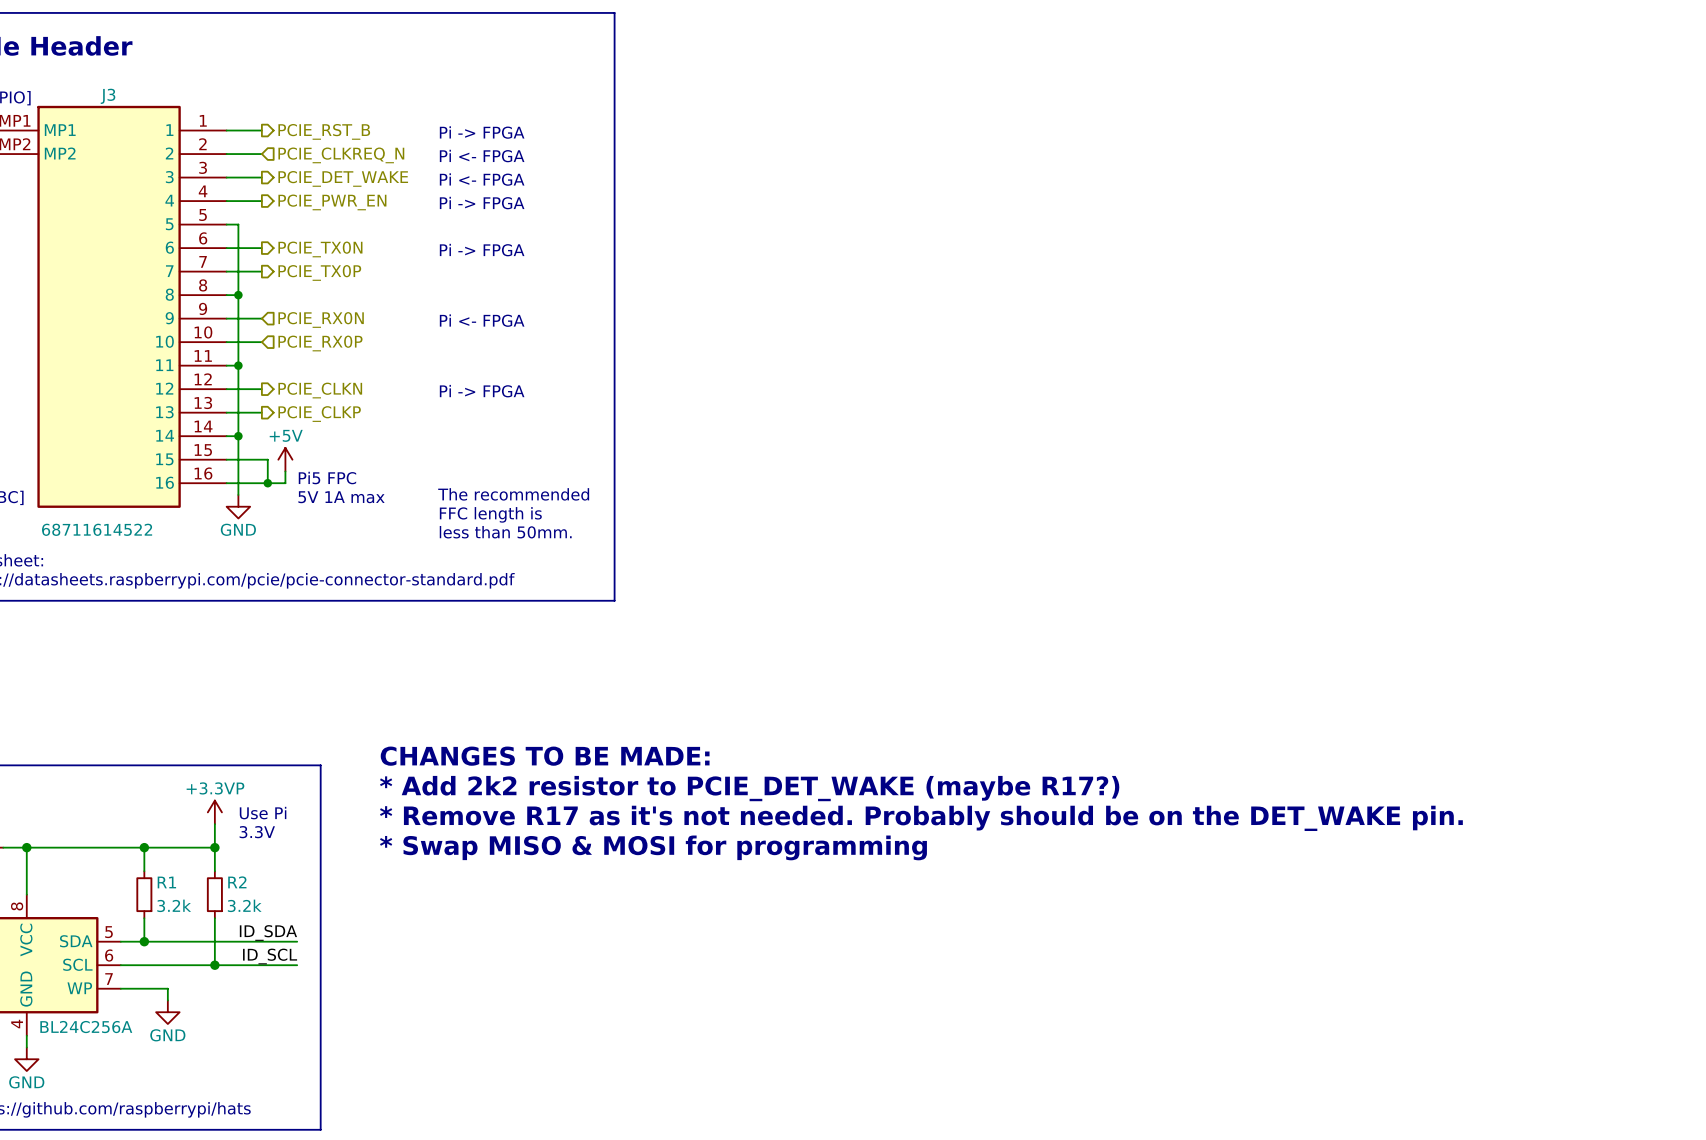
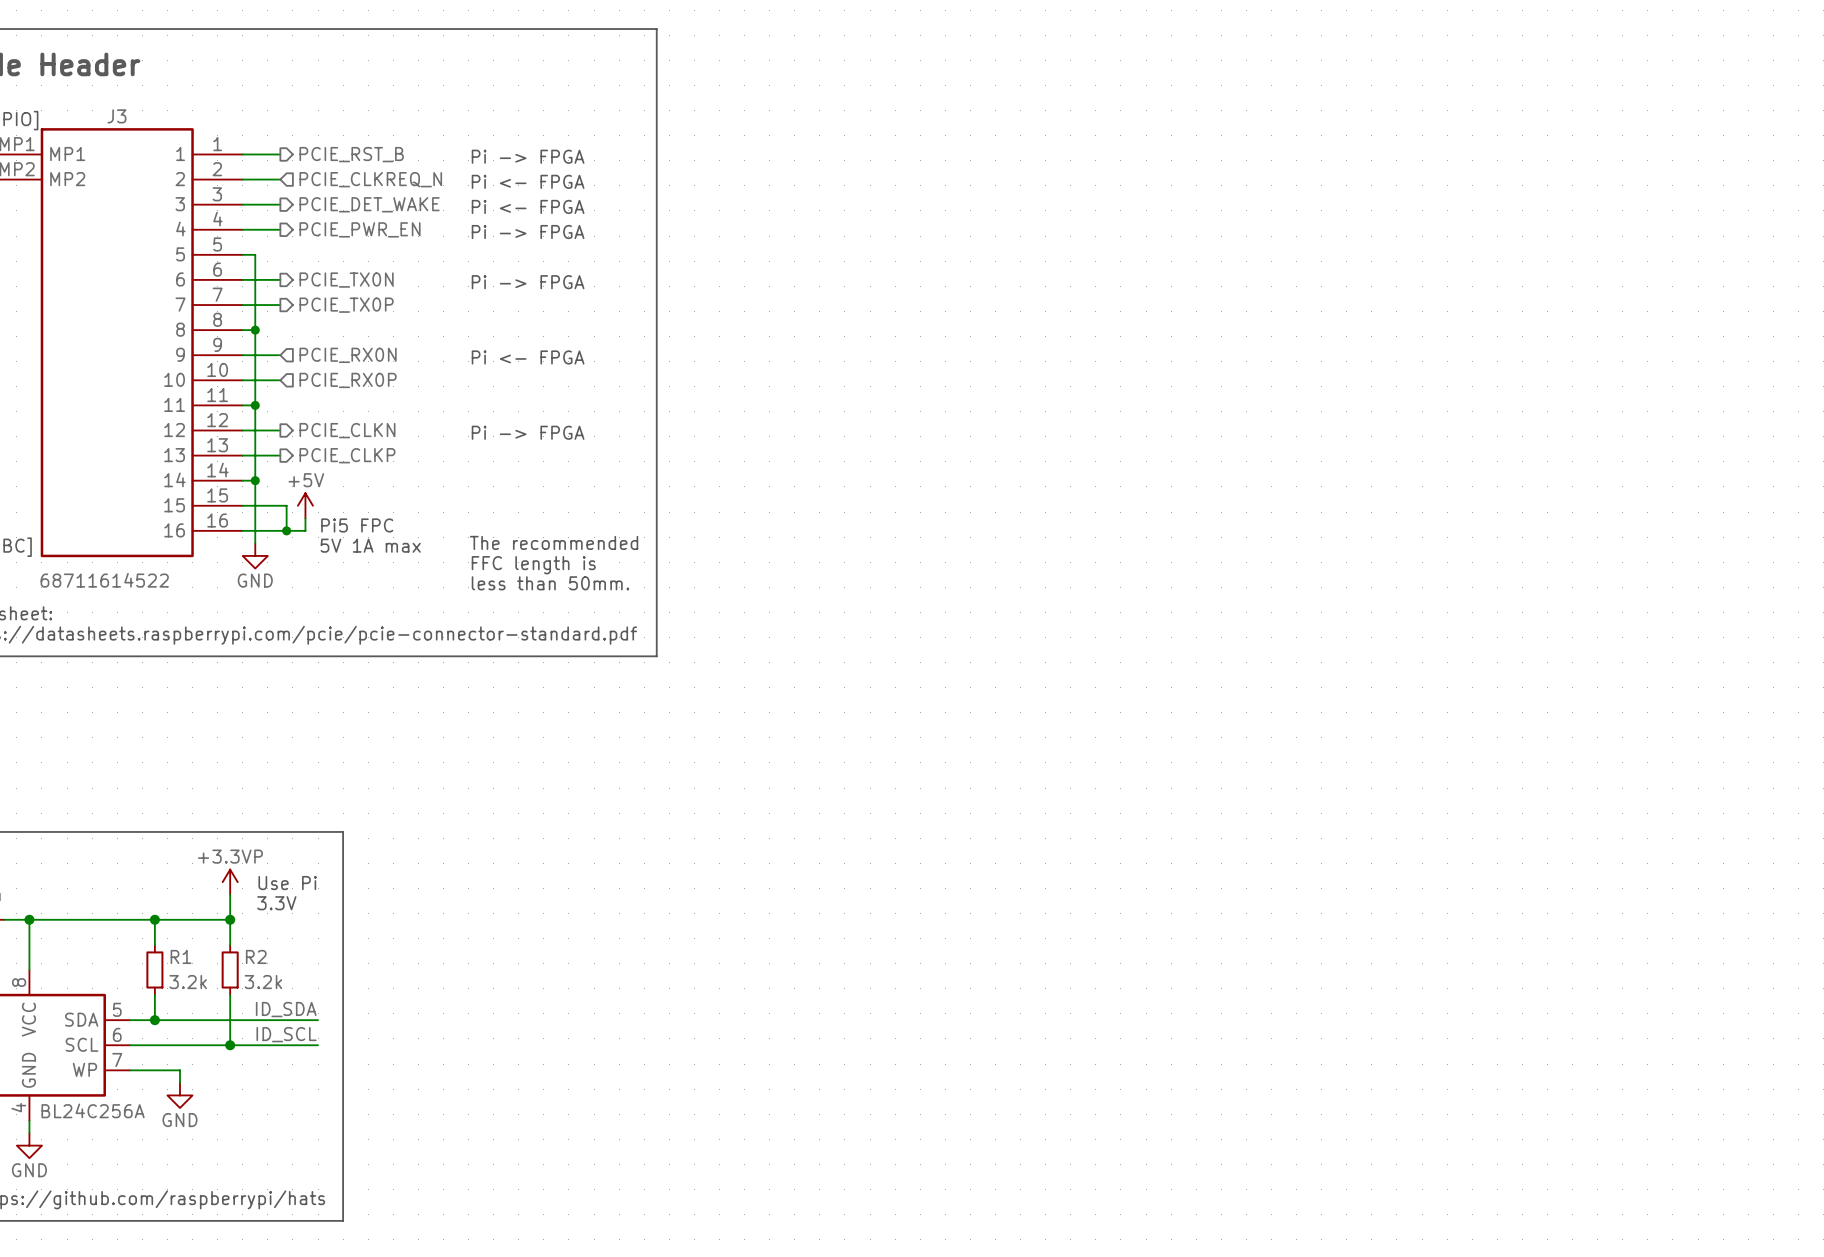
text: CHANGES TO BE MADE: (545, 756) -> none
text: * Add 2k2 resistor to PCIE_DET_WAKE (maybe R17?) (749, 788) -> none
text: * Remove R17 as it's not needed. Probably should be on the DET_WAKE pin. (921, 818) -> none
text: * Swap MISO & MOSI for programming (653, 847) -> none

